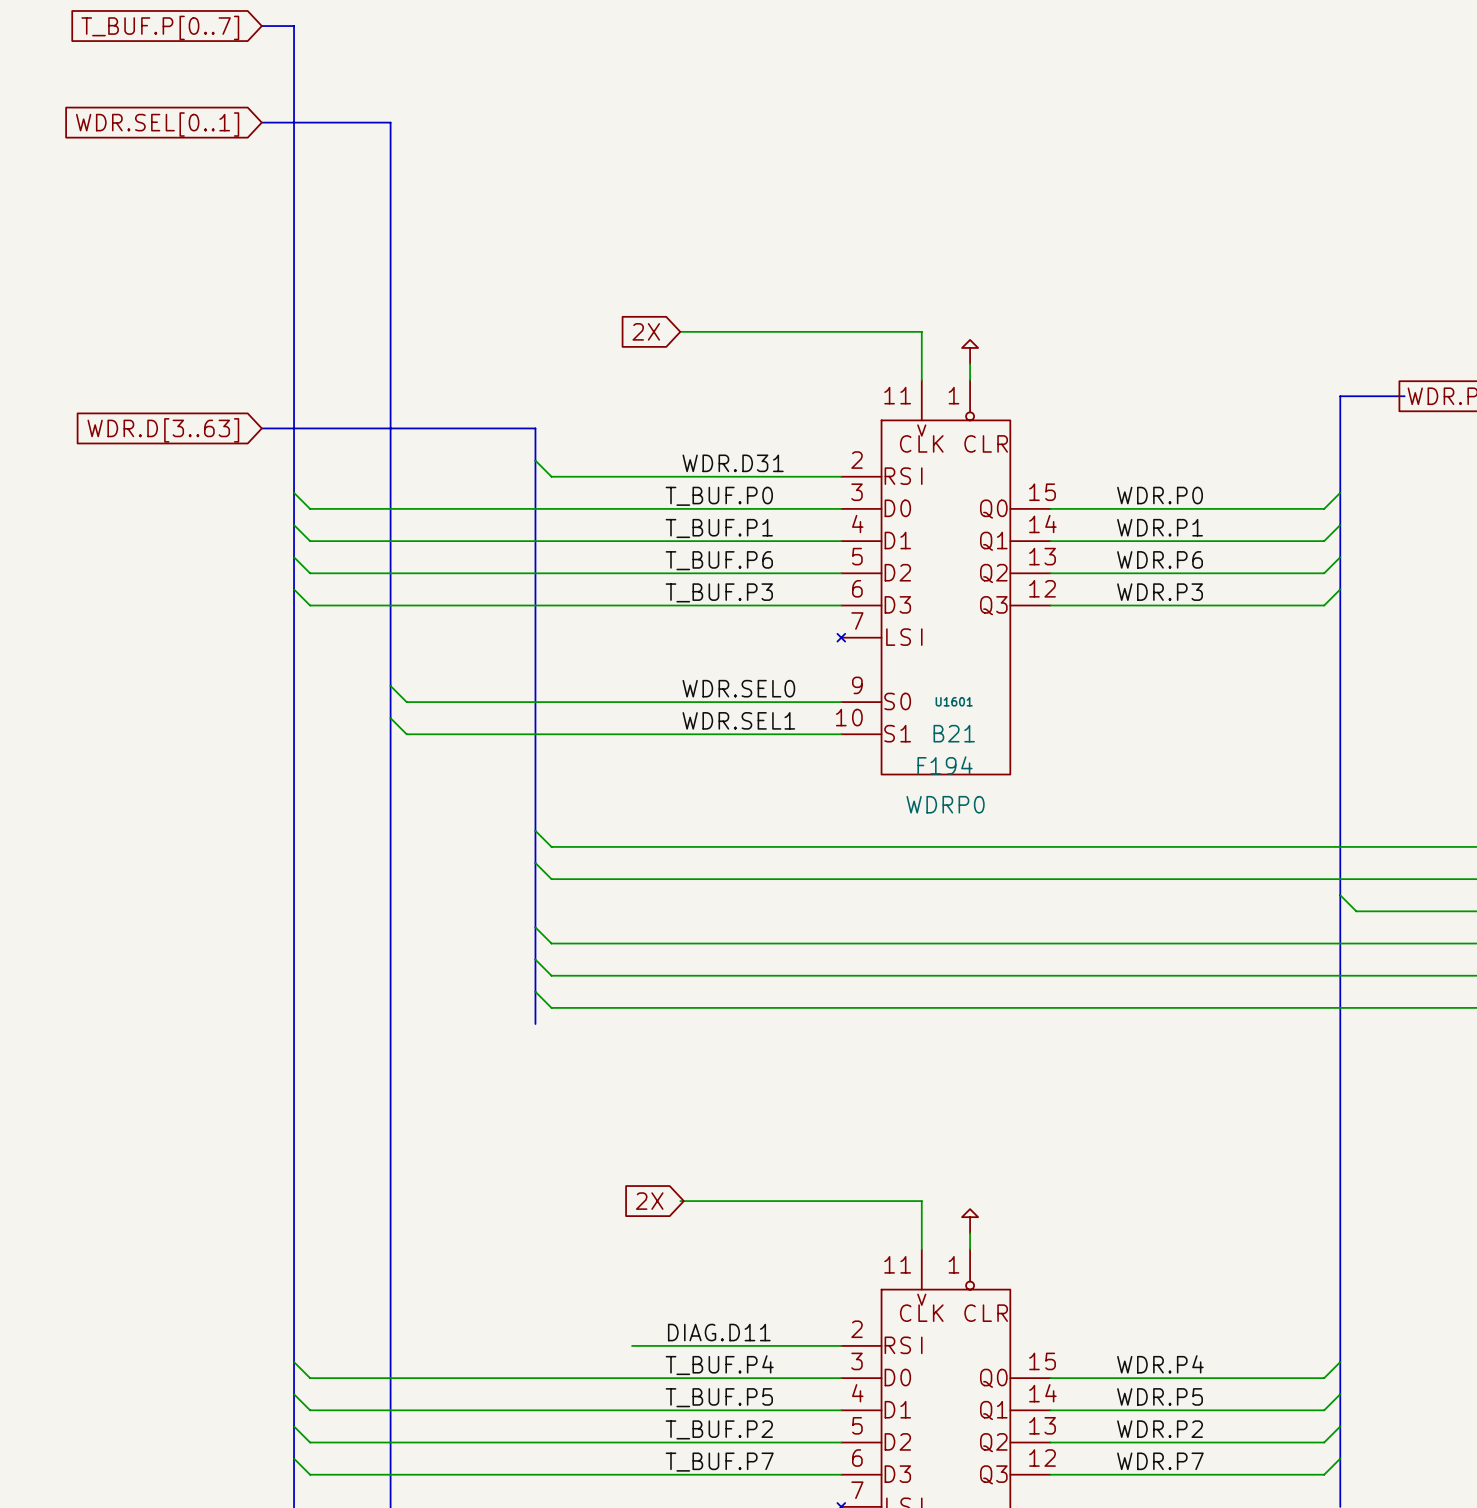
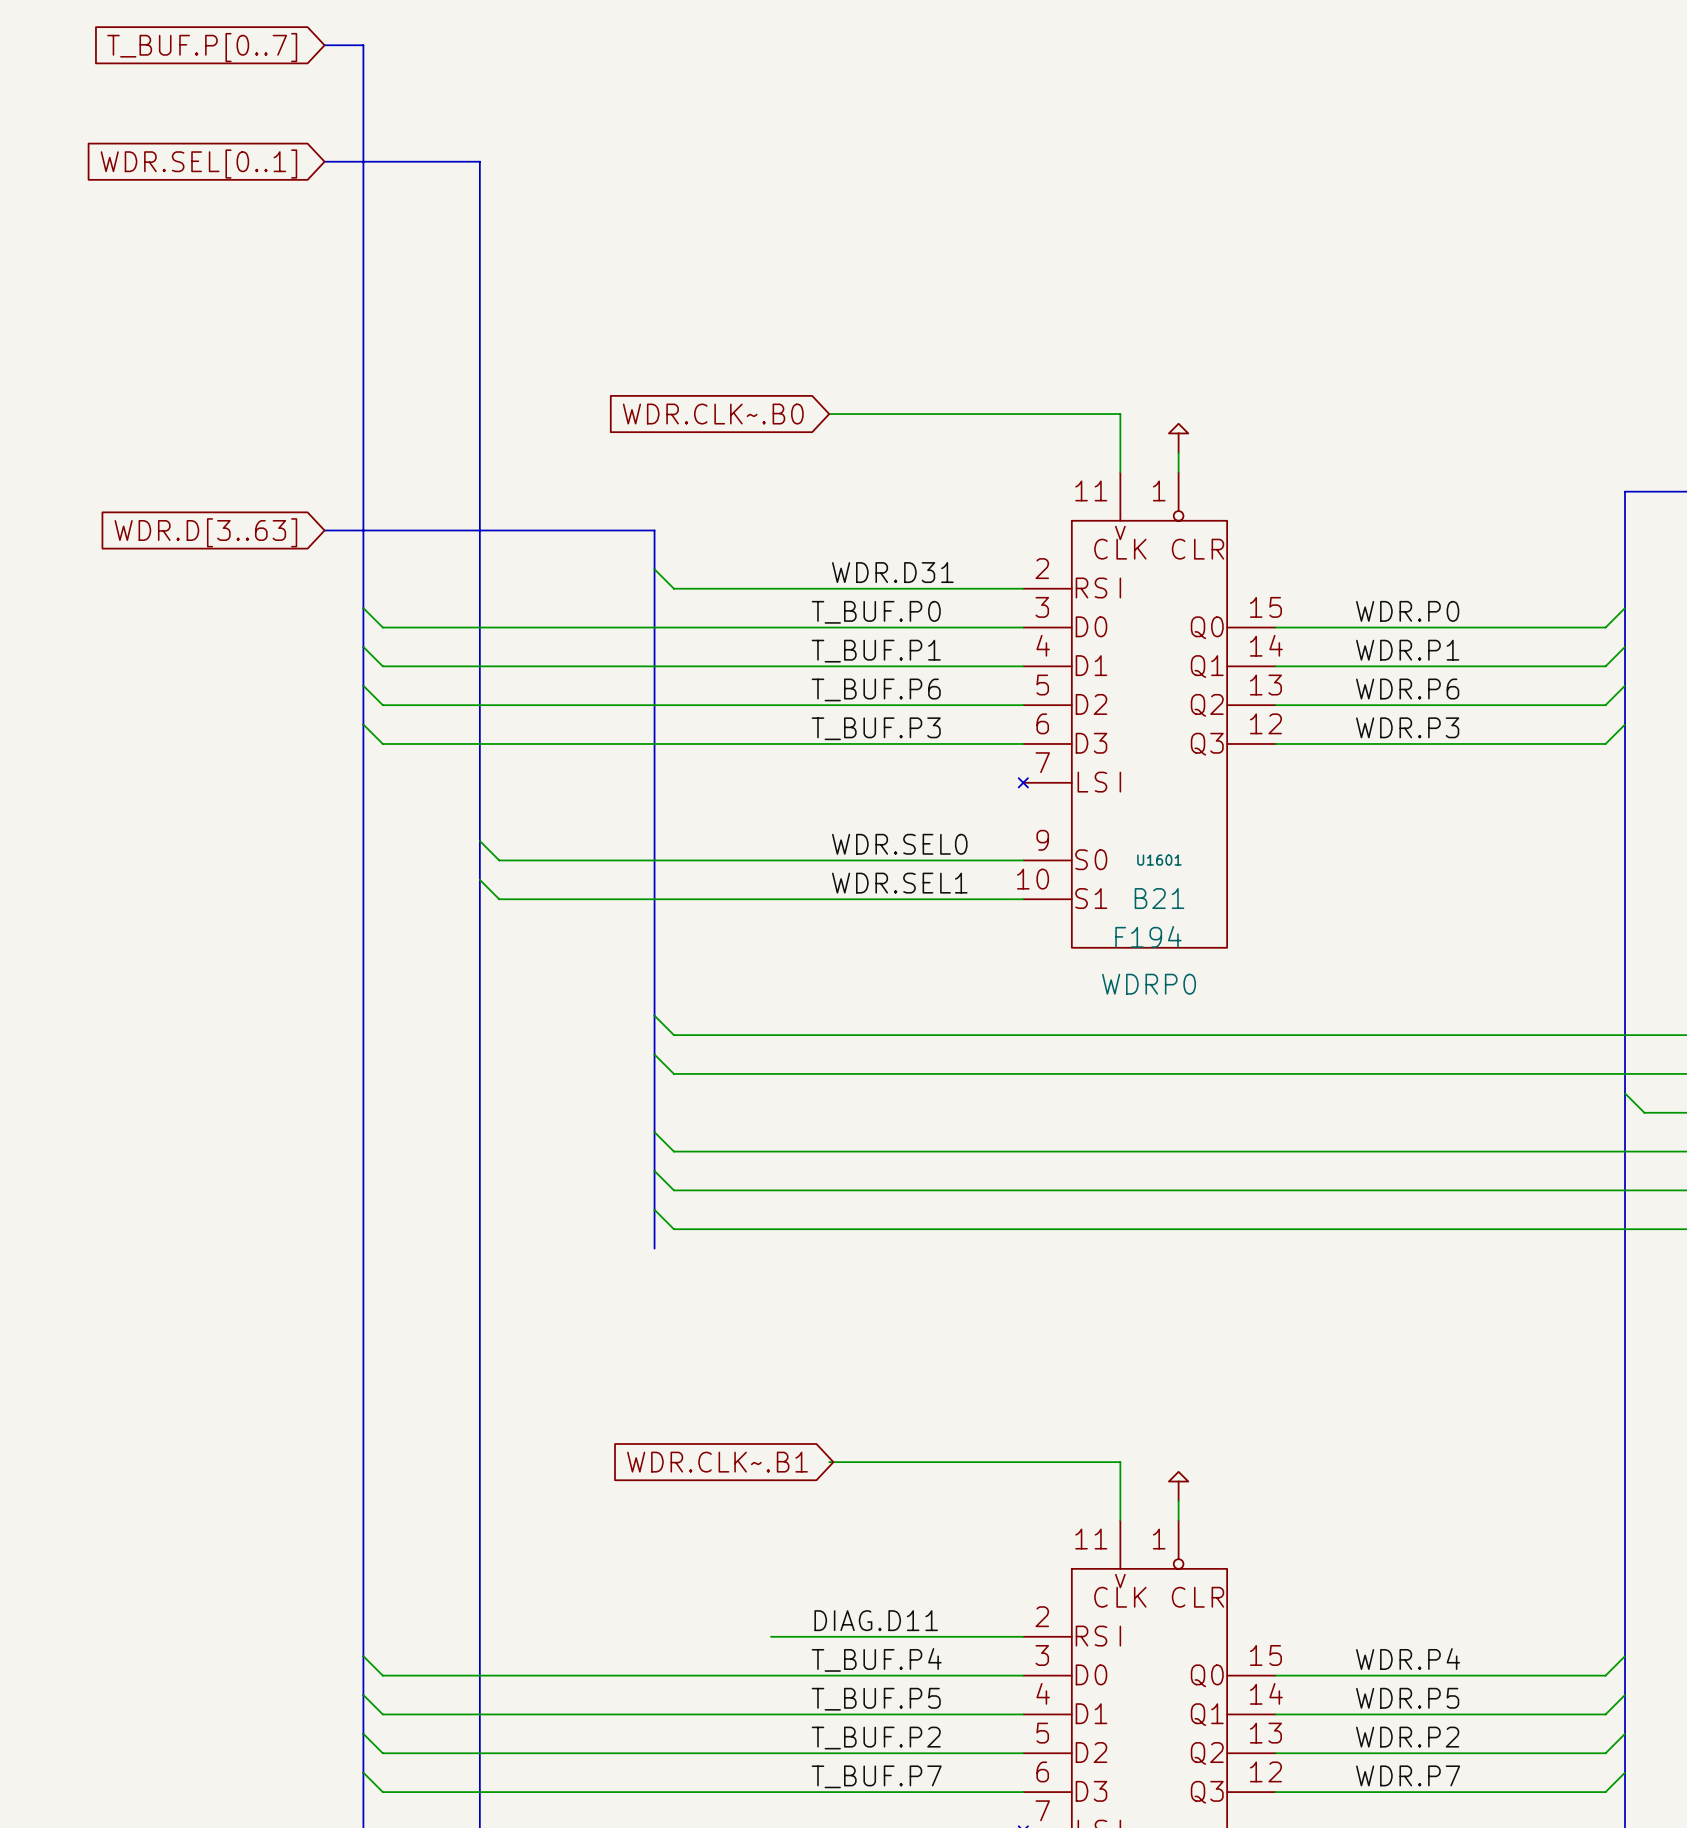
global label: 2X (646, 331) -> WDR.CLK~.B0 (713, 414)
global label: 2X (649, 1201) -> WDR.CLK~.B1 (717, 1462)

